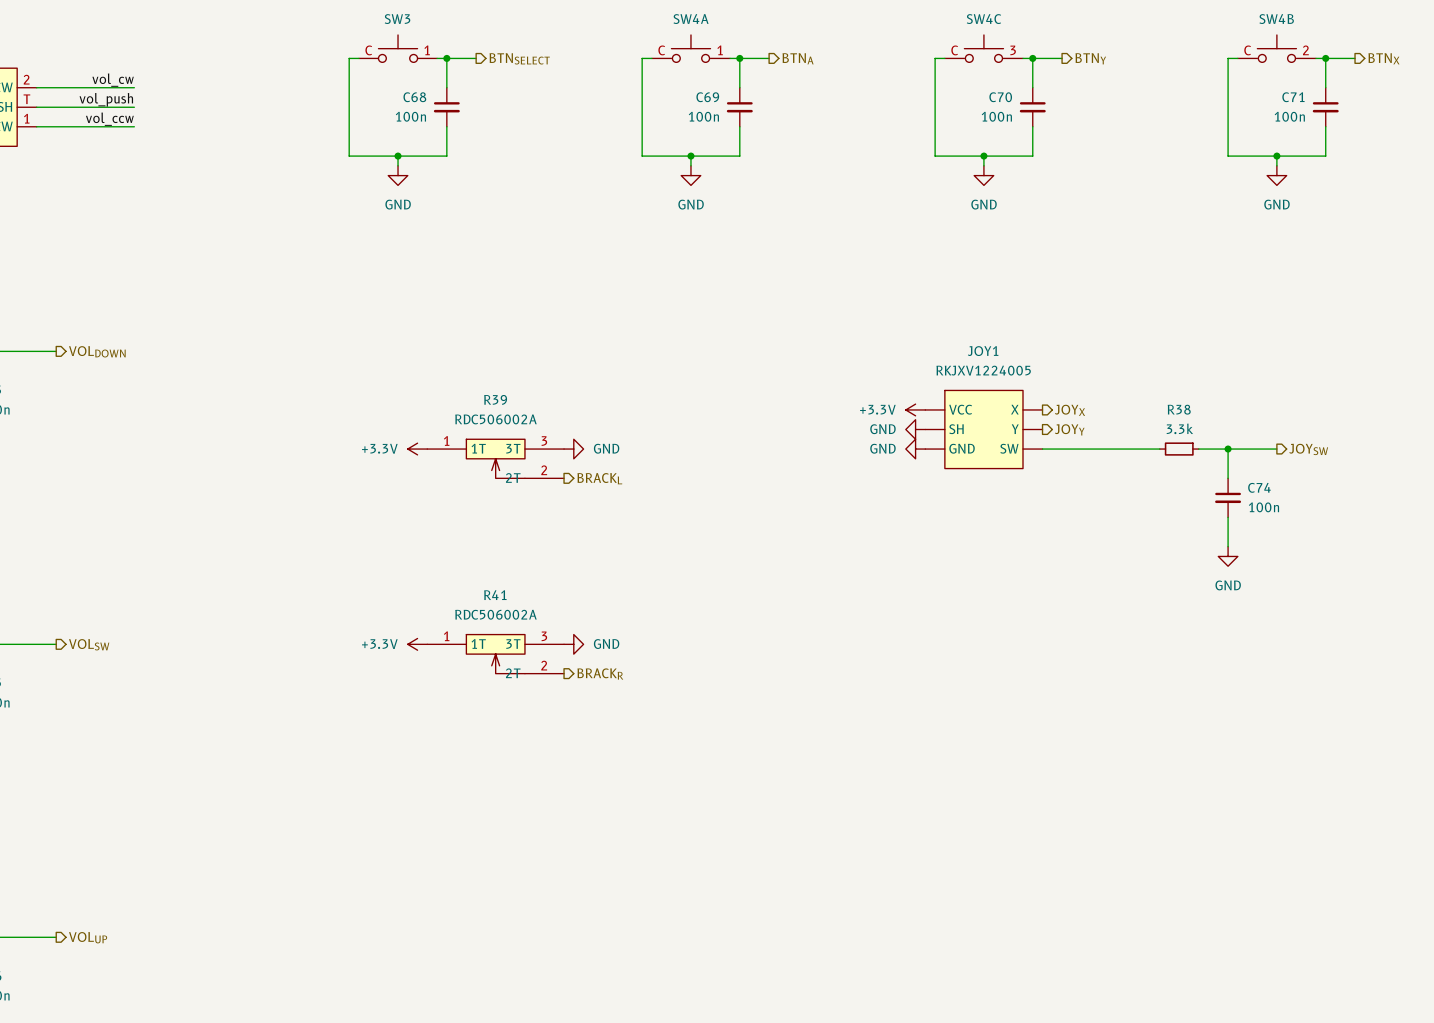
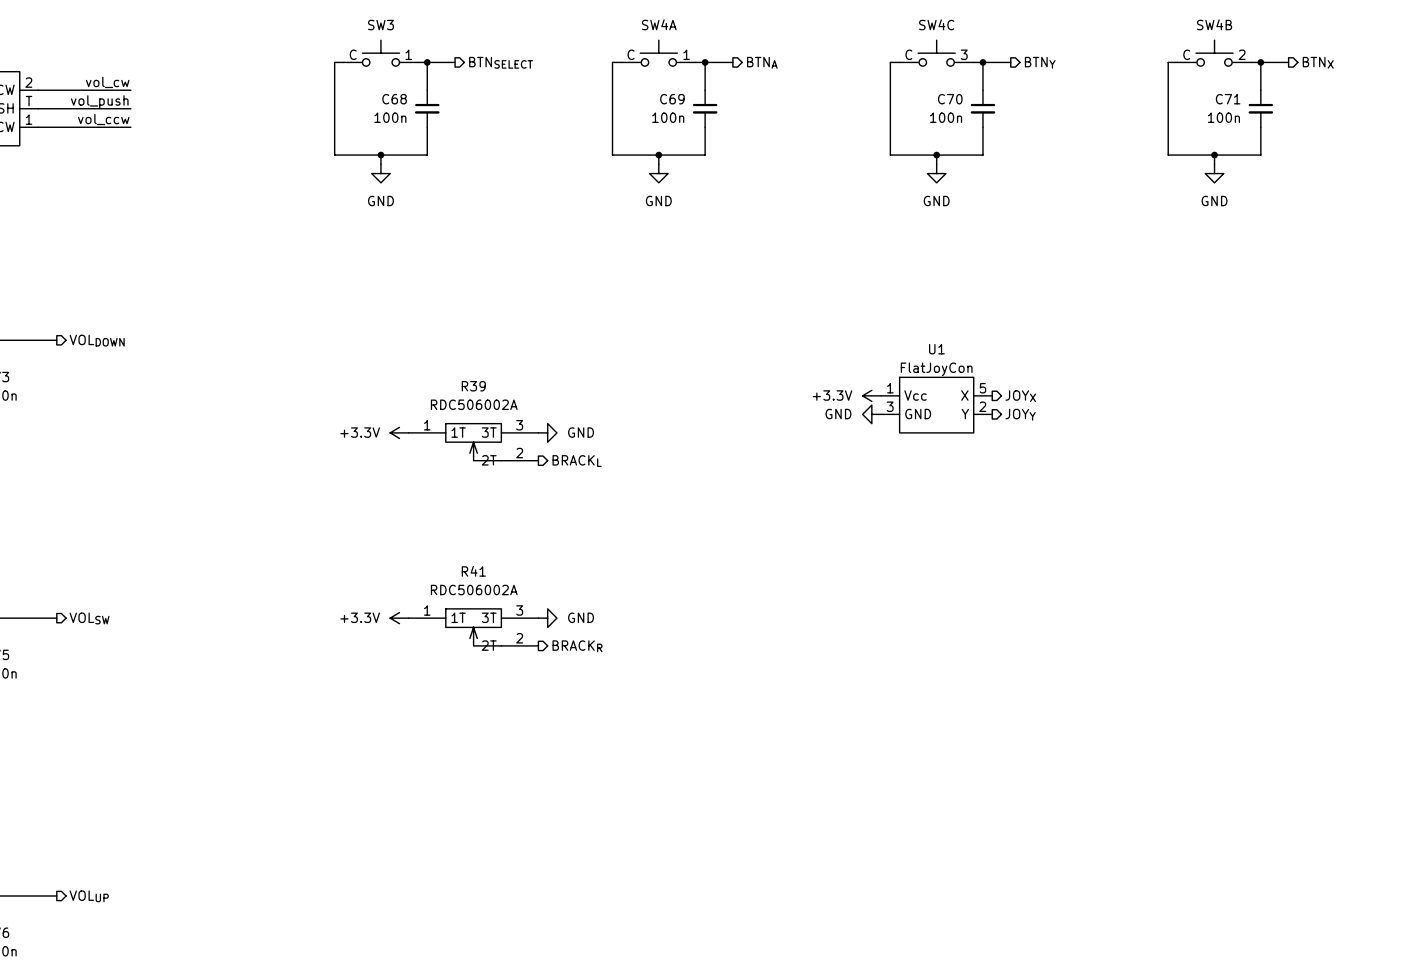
U1: none -> FlatJoyCon (936, 405)
JOY1: RKJXV1224005 (983, 429) -> none
power symbol: GND (915, 449) -> none
wire: (1042, 449) (1159, 449) -> none
R38: 3.3k (1179, 449) -> none
wire: (1198, 449) (1276, 449) -> none
wire: (1228, 449) (1228, 478) -> none
junction: (1228, 449) -> none
hierarchical label: JOYSW (1308, 449) -> none
C74: 100n (1228, 497) -> none
wire: (1228, 517) (1228, 546) -> none
power symbol: GND (1228, 556) -> none

